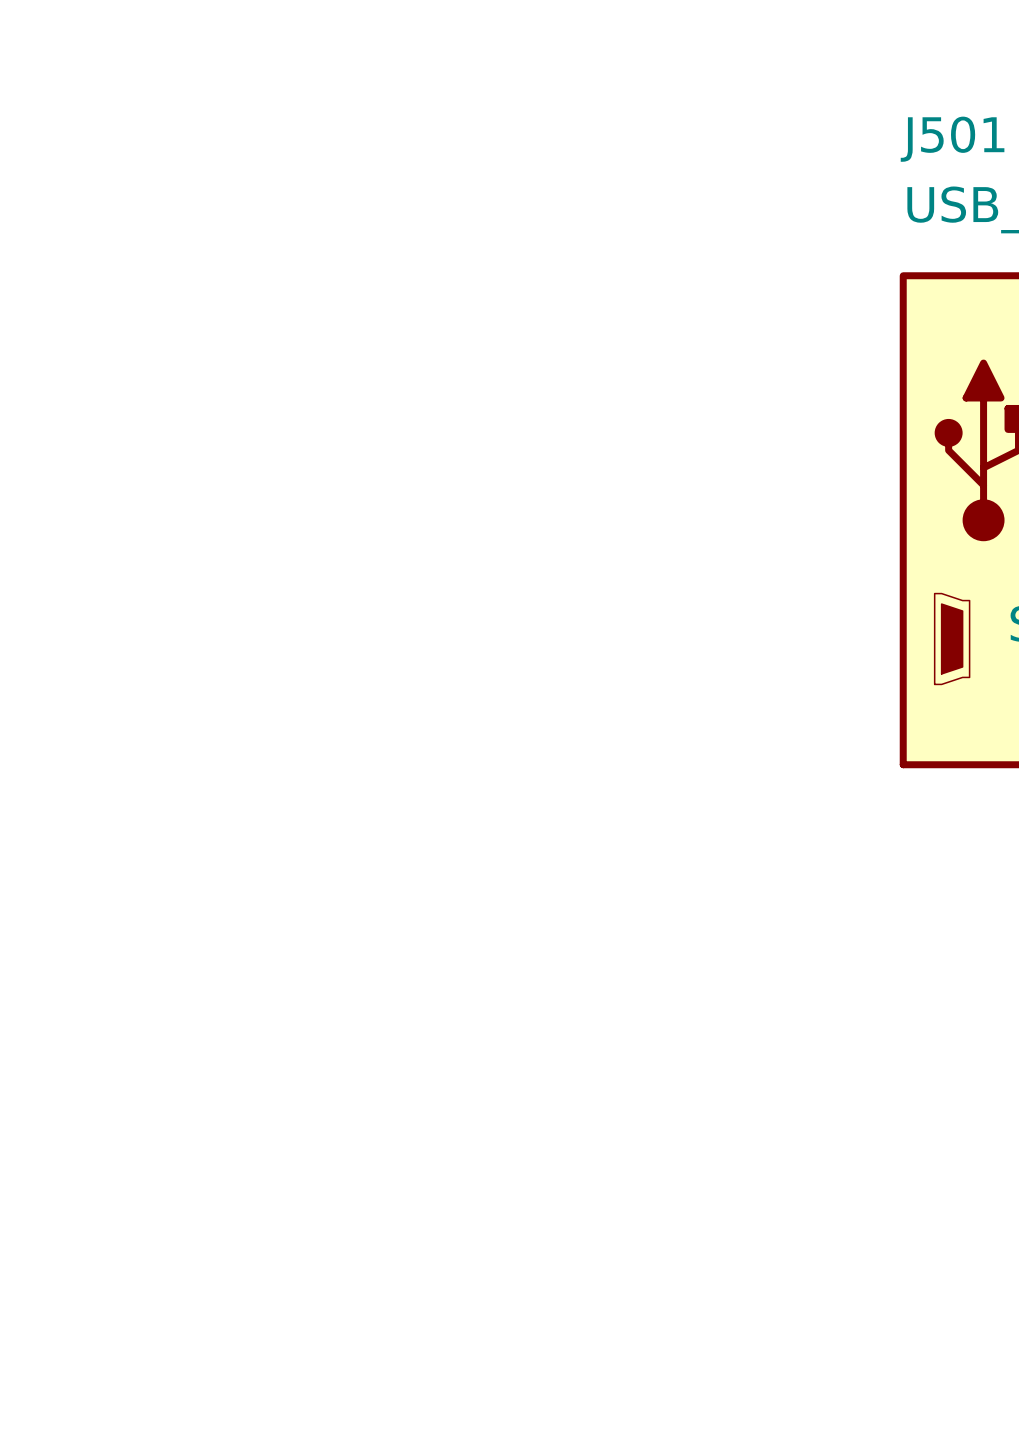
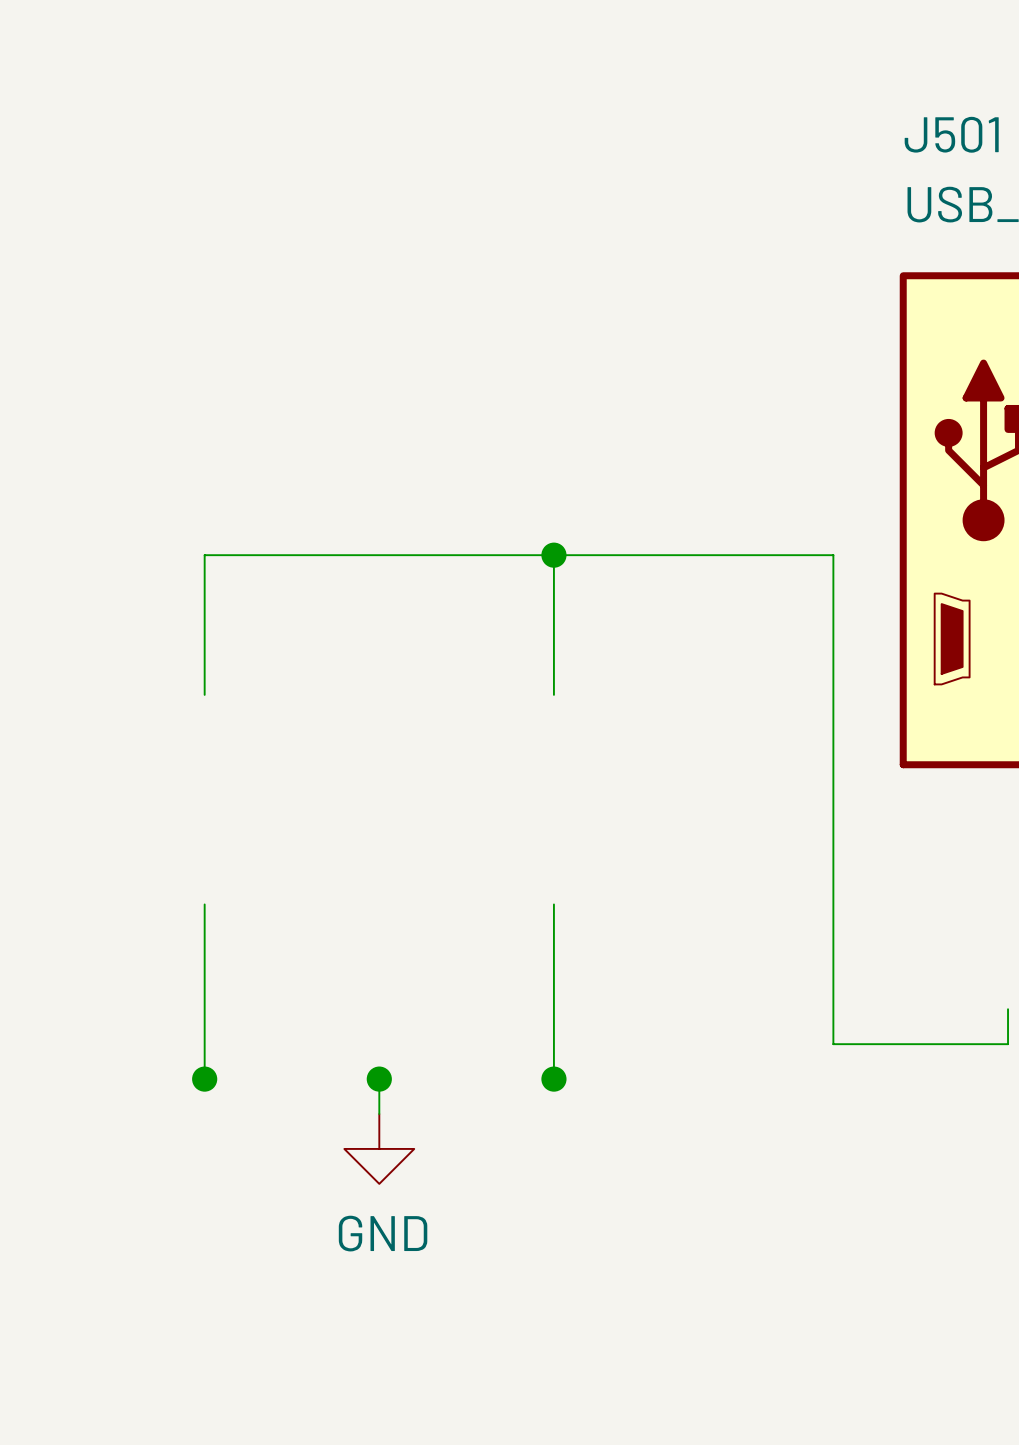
wire: none -> (553, 555) (553, 694)
junction: none -> (553, 555)
wire: none -> (204, 694) (204, 555) (833, 555) (833, 1044) (1008, 1044) (1008, 1009)
wire: none -> (204, 904) (204, 1079)
wire: none -> (553, 904) (553, 1079)
junction: none -> (204, 1079)
wire: none -> (379, 1079) (379, 1114)
junction: none -> (379, 1079)
junction: none -> (553, 1079)
power symbol: none -> GND (379, 1148)

